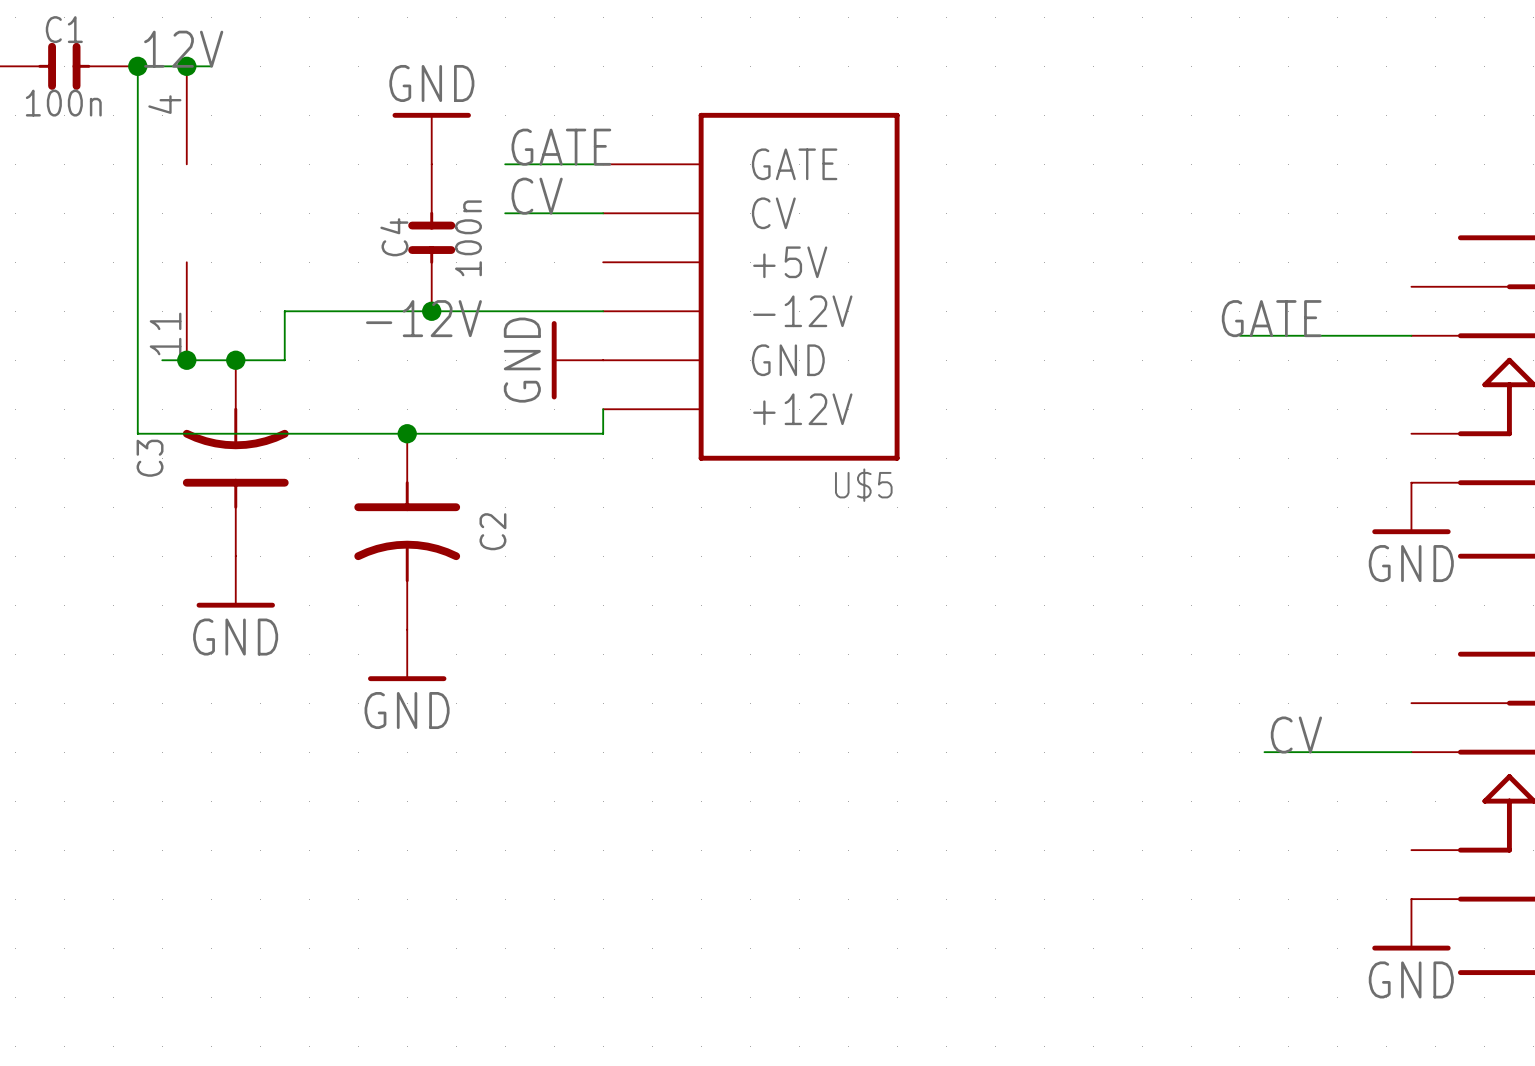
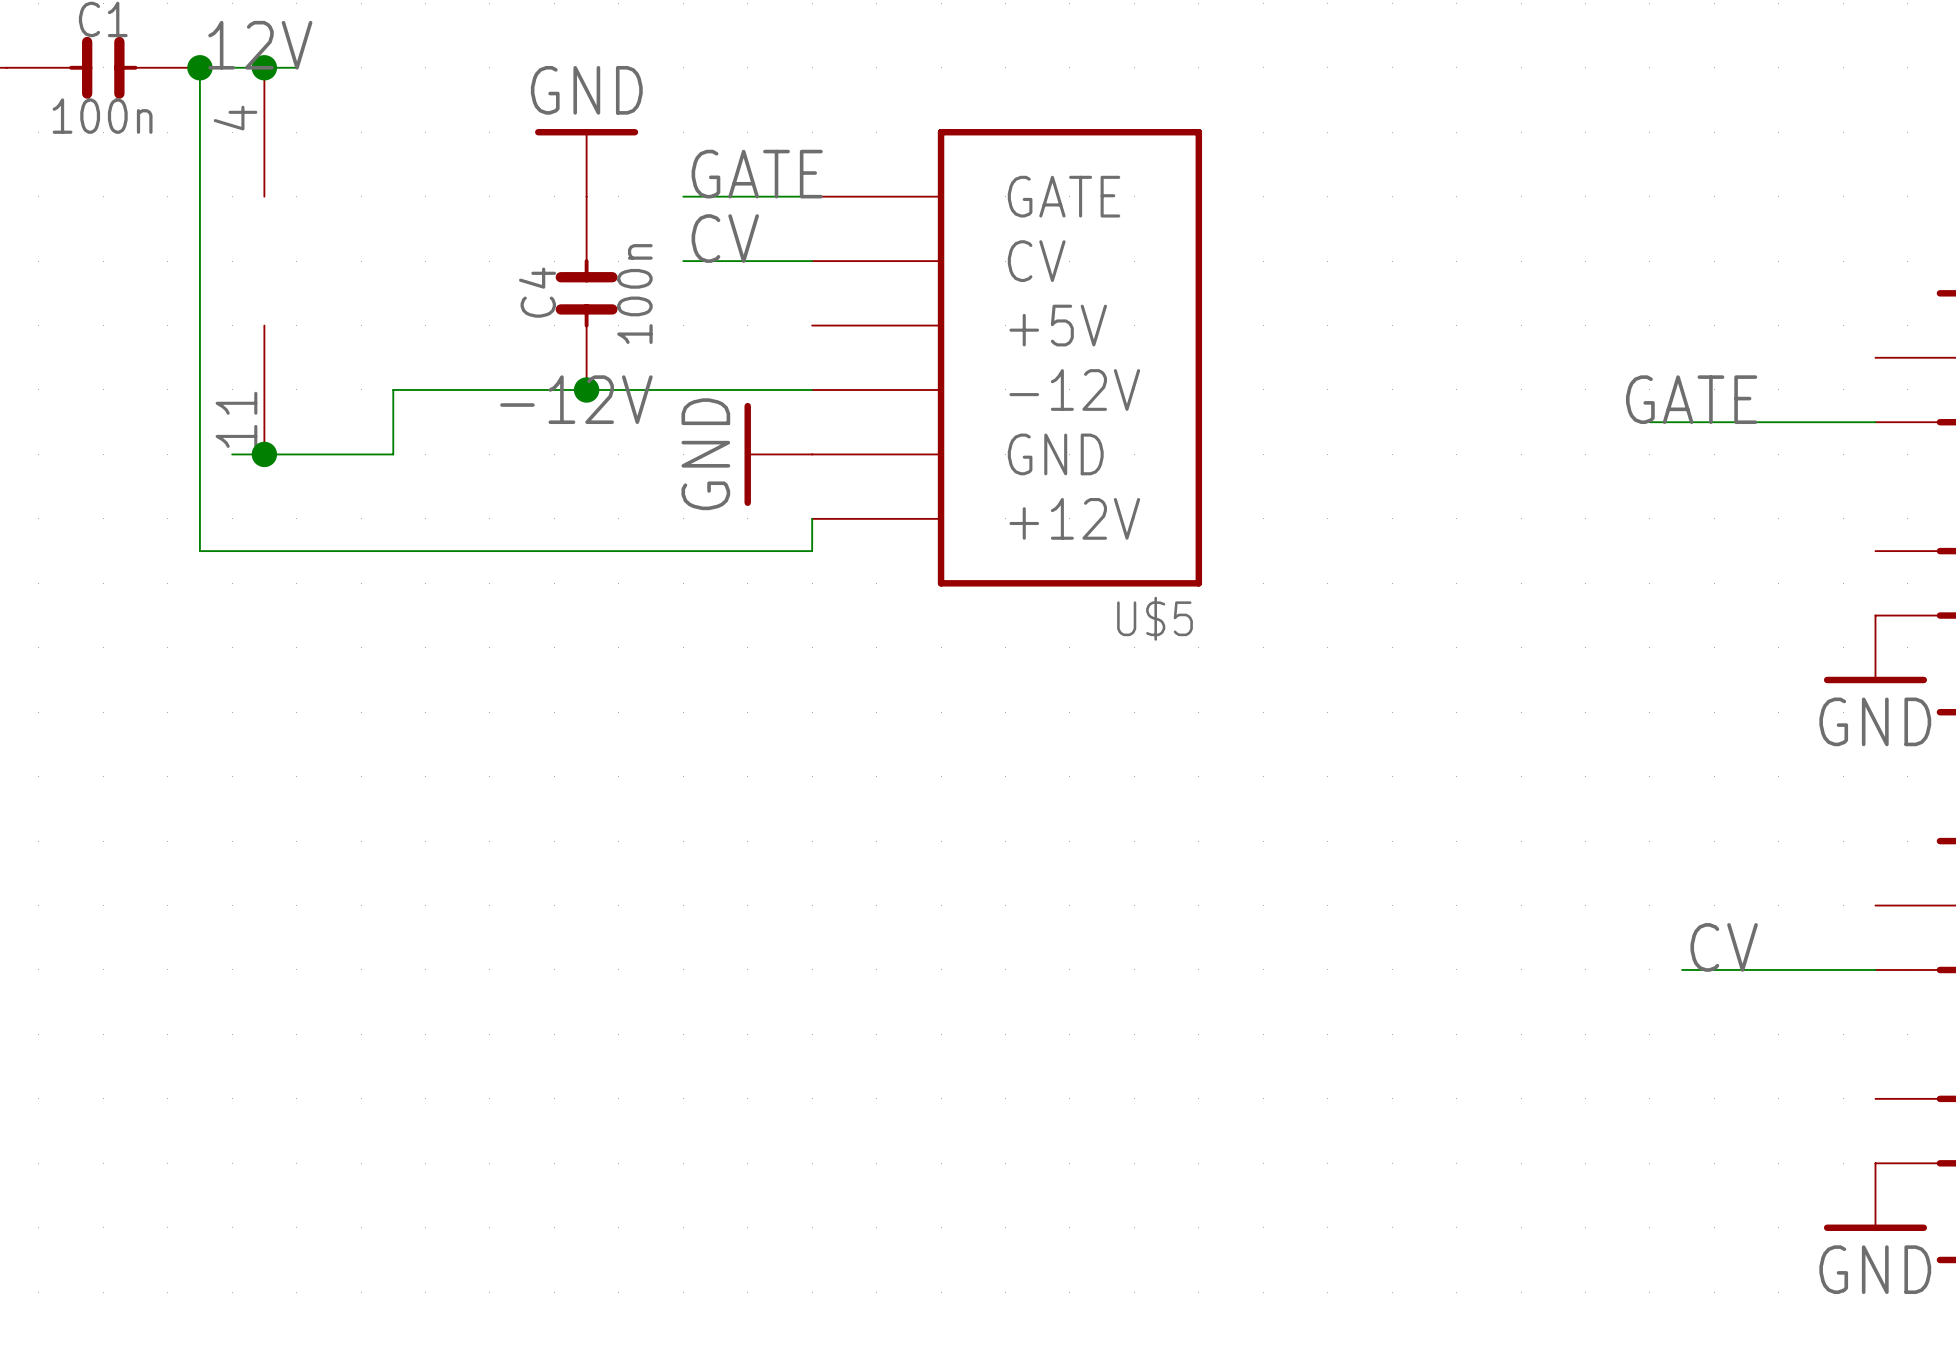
junction: (235, 360) -> none
junction: (407, 433) -> none
C3: (235, 458) -> none
C2: (407, 531) -> none
power symbol: GND (235, 581) -> none
power symbol: GND (407, 655) -> none

